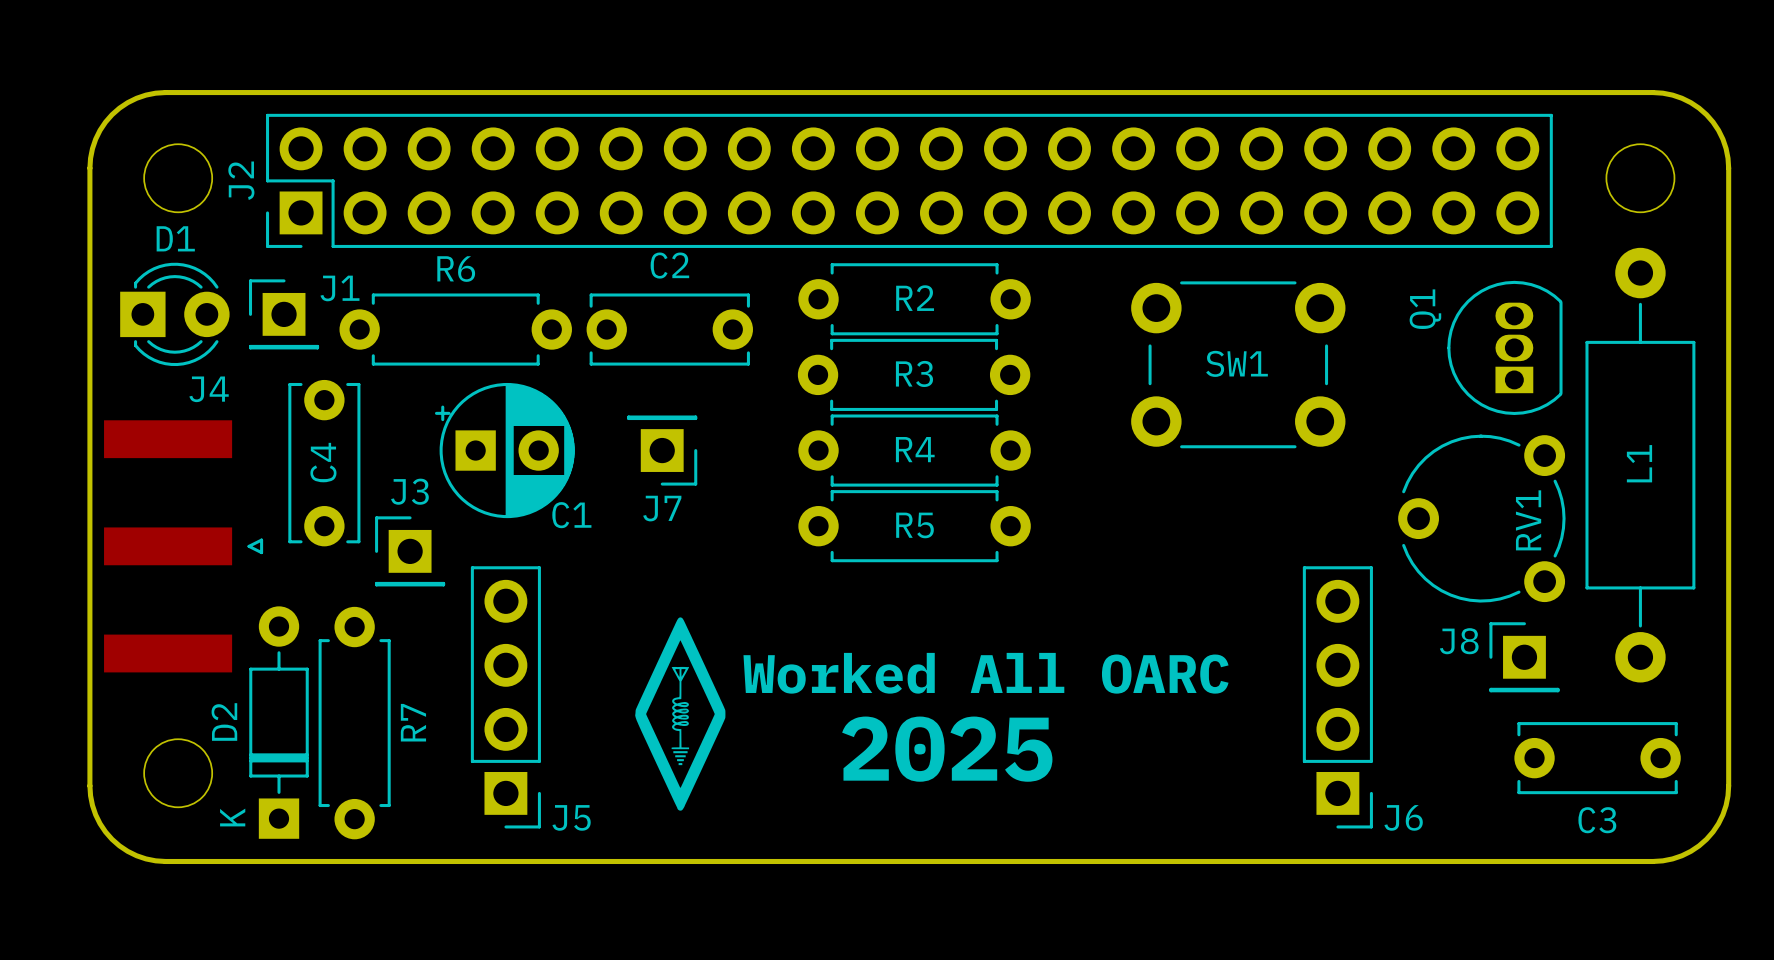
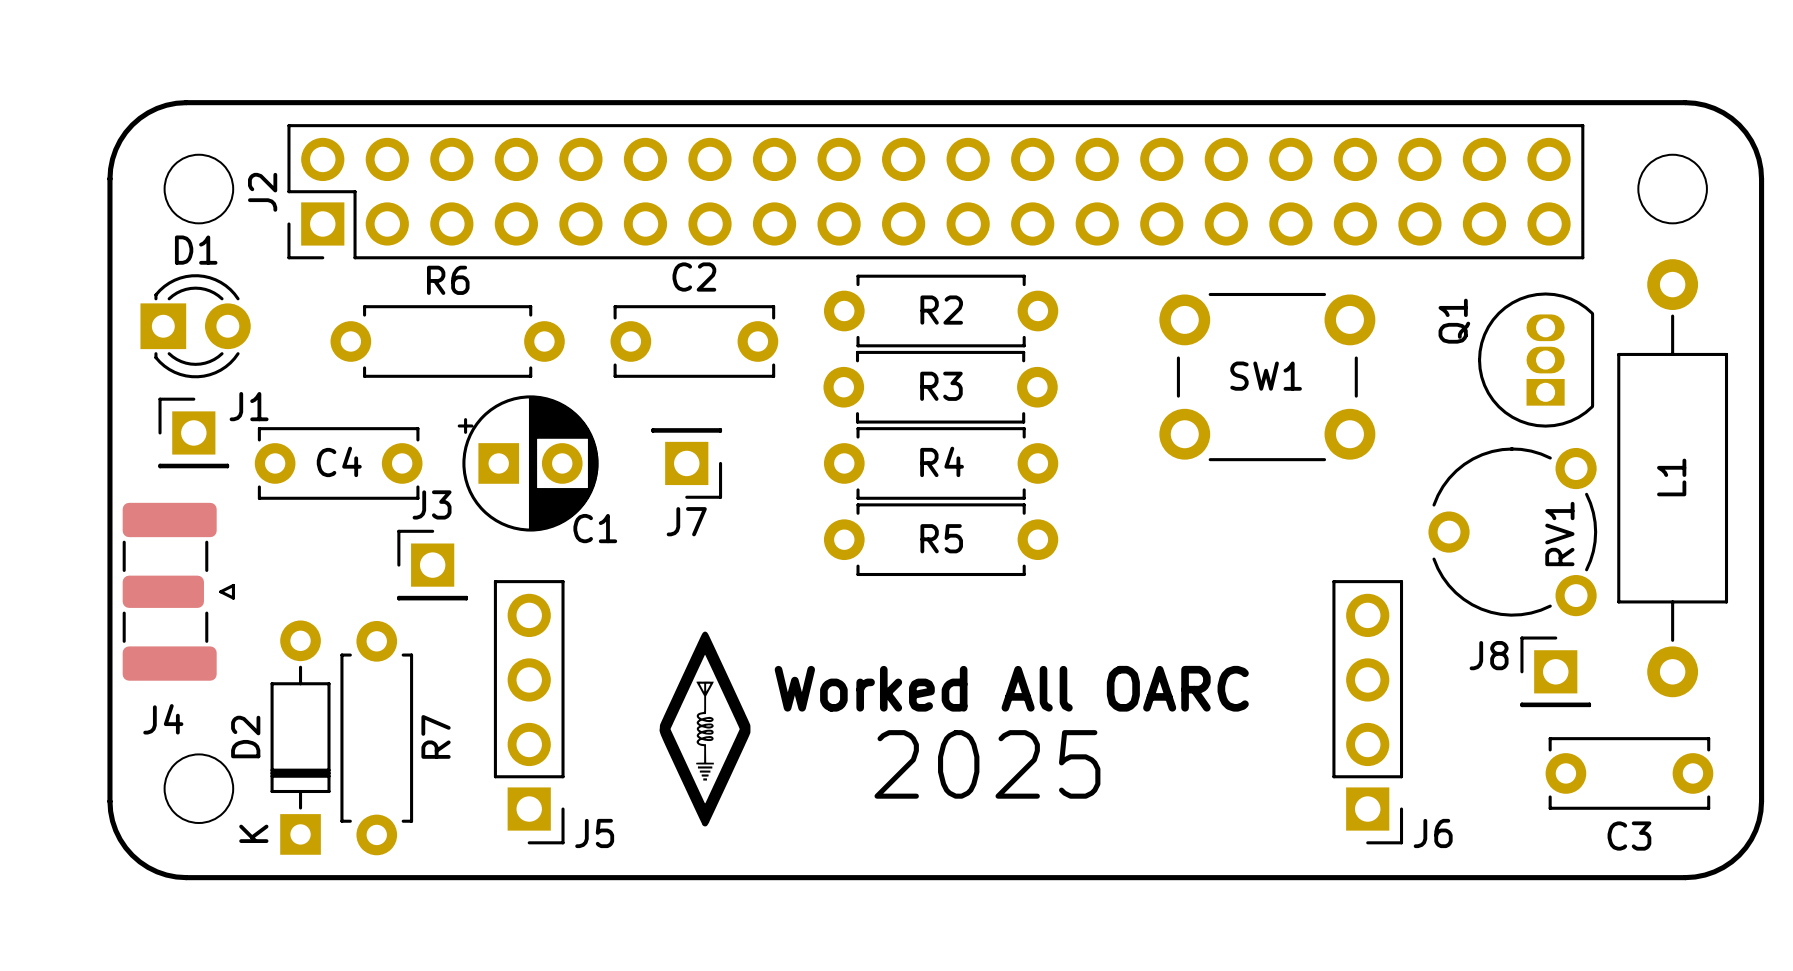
J1 position: (284, 314) -> (193, 432)
R6 position: (455, 329) -> (447, 341)
J4 name position: J4 (209, 389) -> J4 (163, 719)
J4 footprint: [104, 420, 264, 673] -> [122, 502, 235, 681]
C4 rotation: 0° (324, 463) -> 90° clockwise (338, 463)

